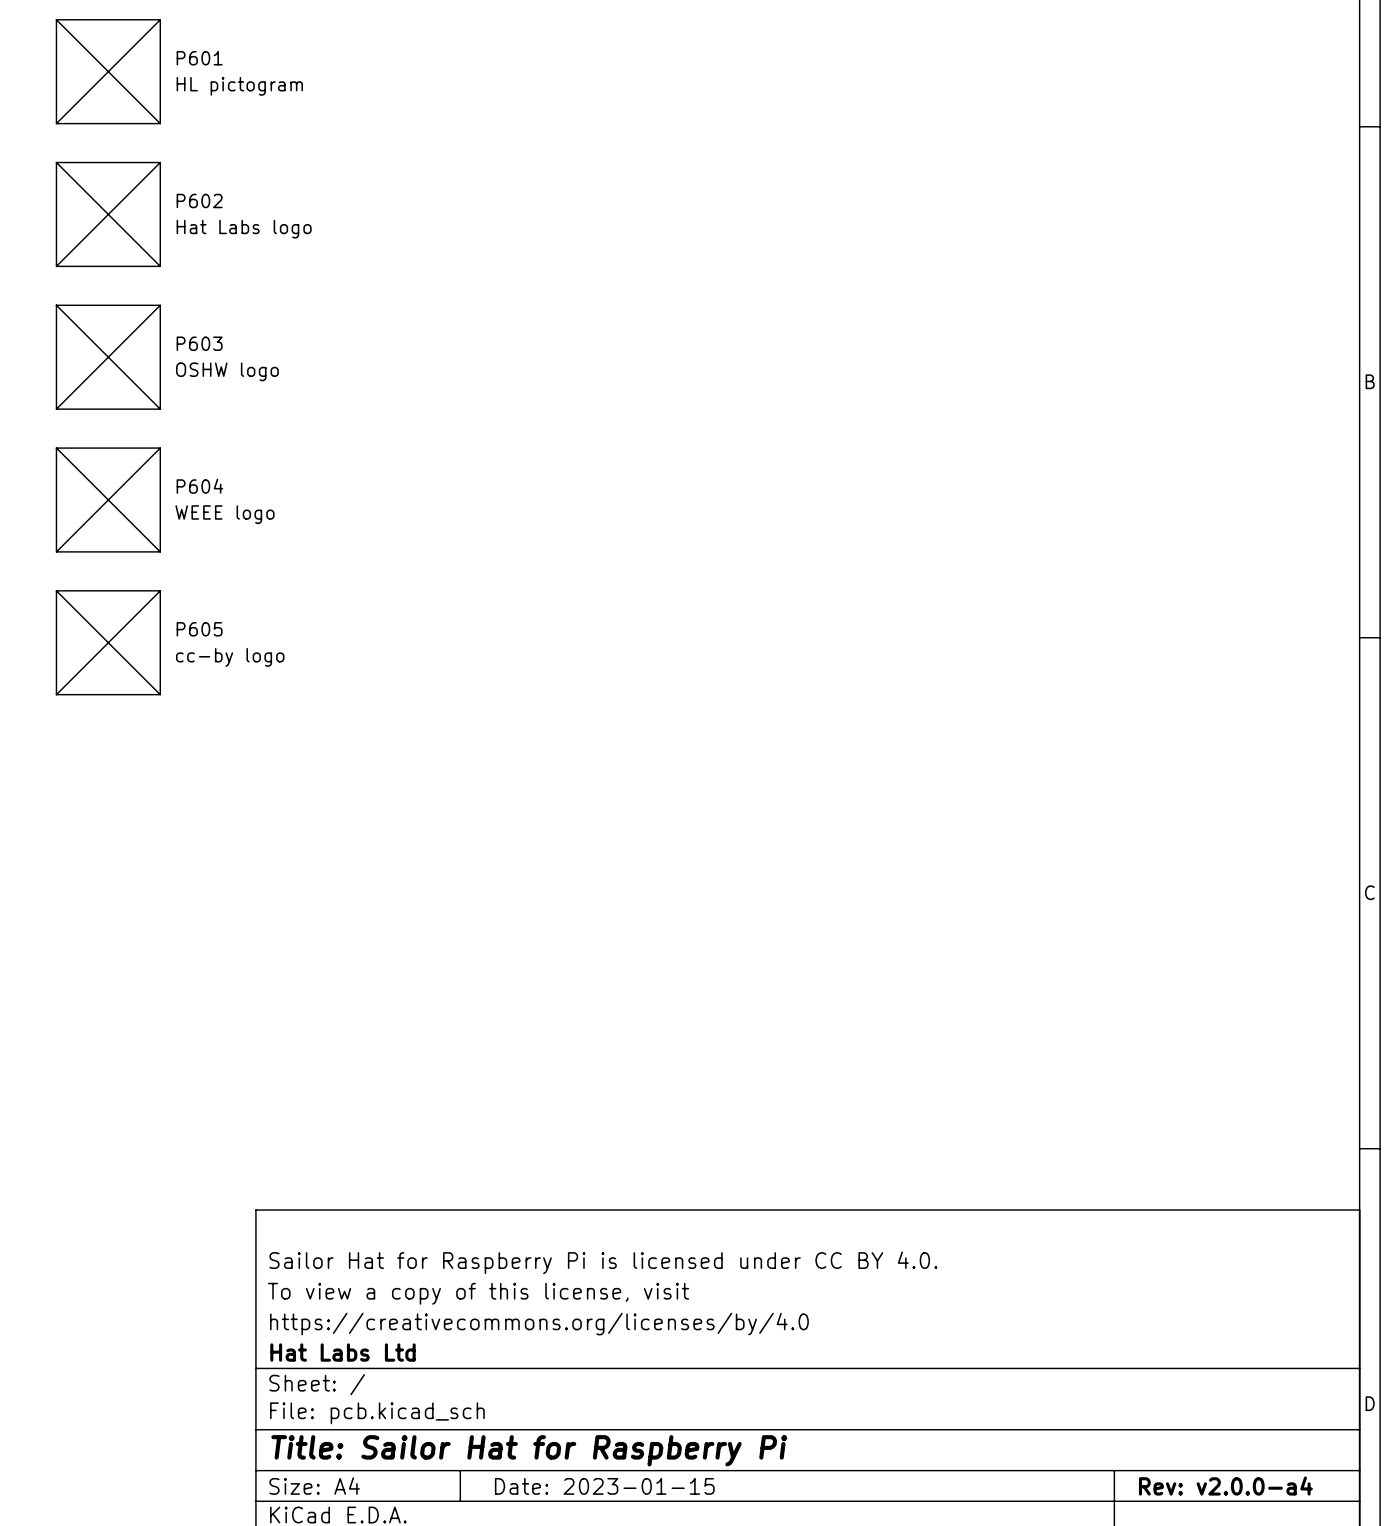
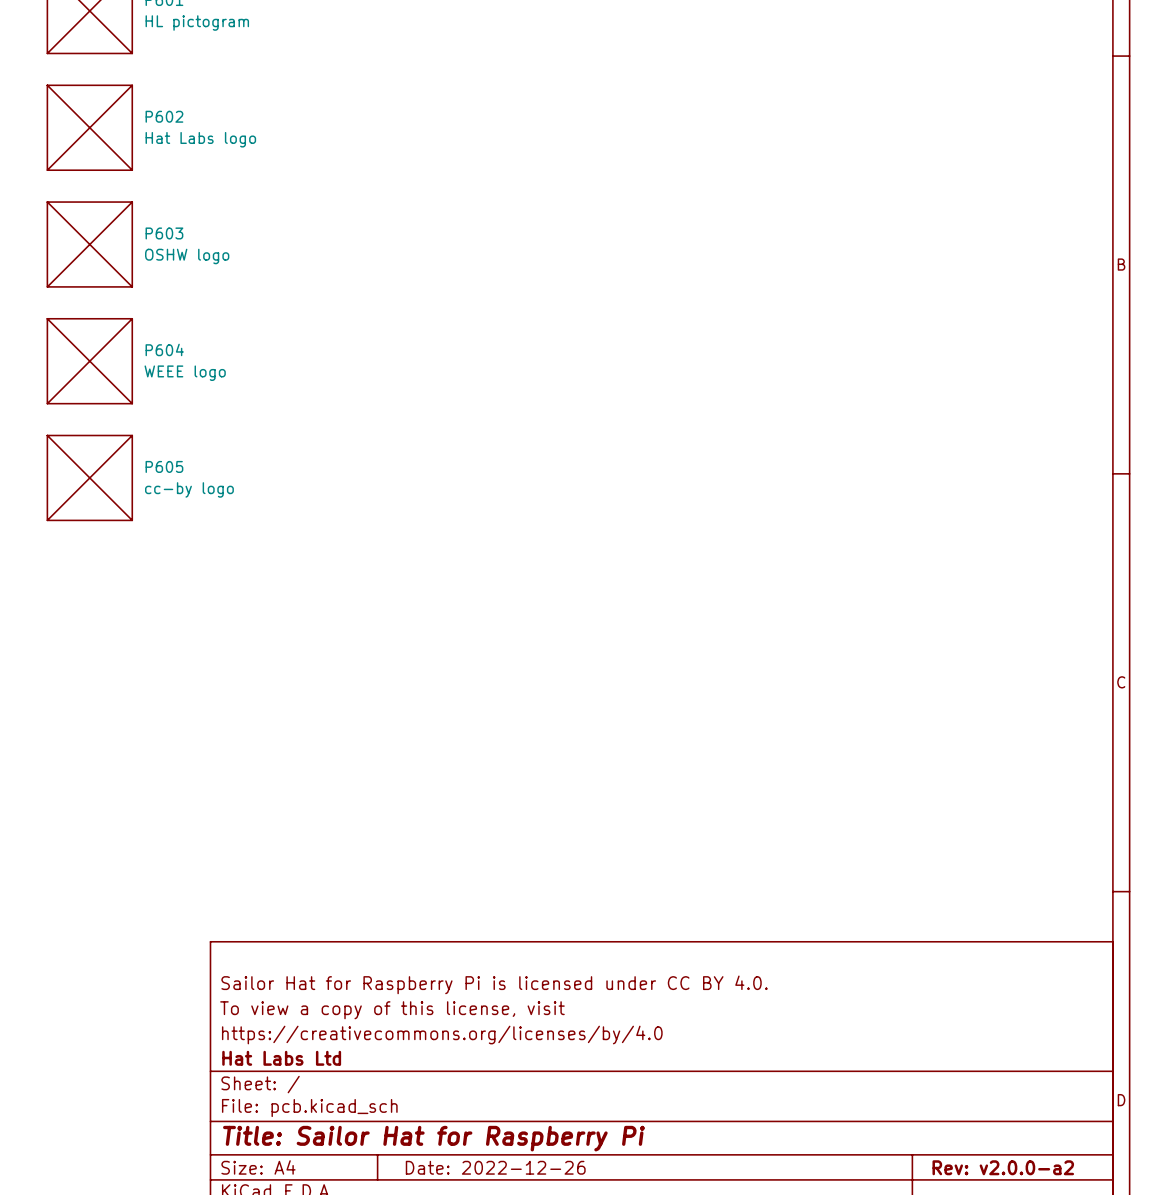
title block: Date: 2023-01-15 (604, 1486) -> Date: 2022-12-26 (495, 1167)
title block: Rev: v2.0.0-a4 (1225, 1486) -> Rev: v2.0.0-a2 (1003, 1167)

